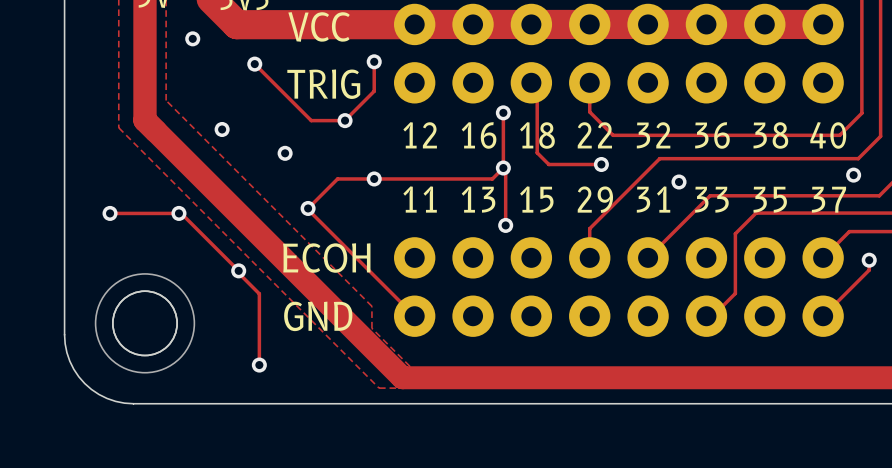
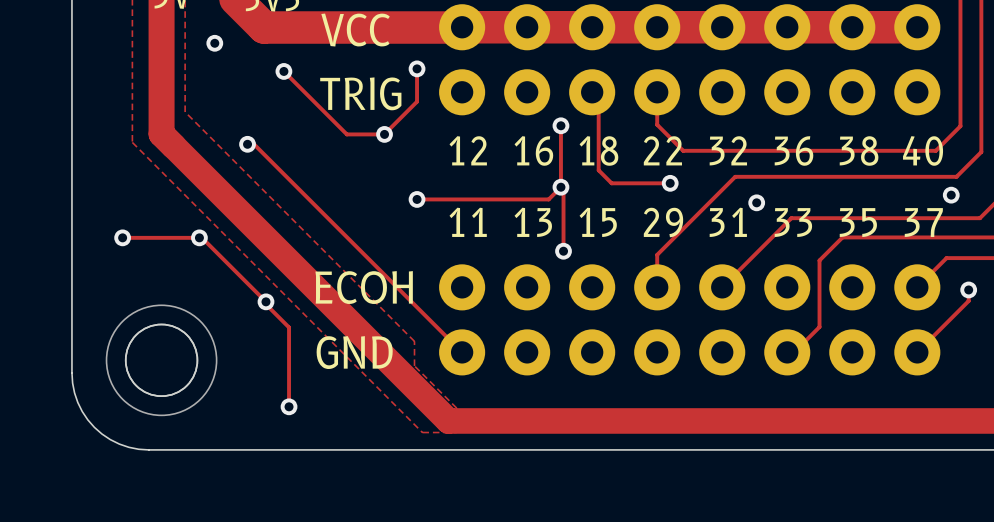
via: (285, 153) -> none
track: (374, 178) (337, 178) (308, 209) -> (247, 144) (254, 144) (343, 233)
via: (308, 208) -> none

